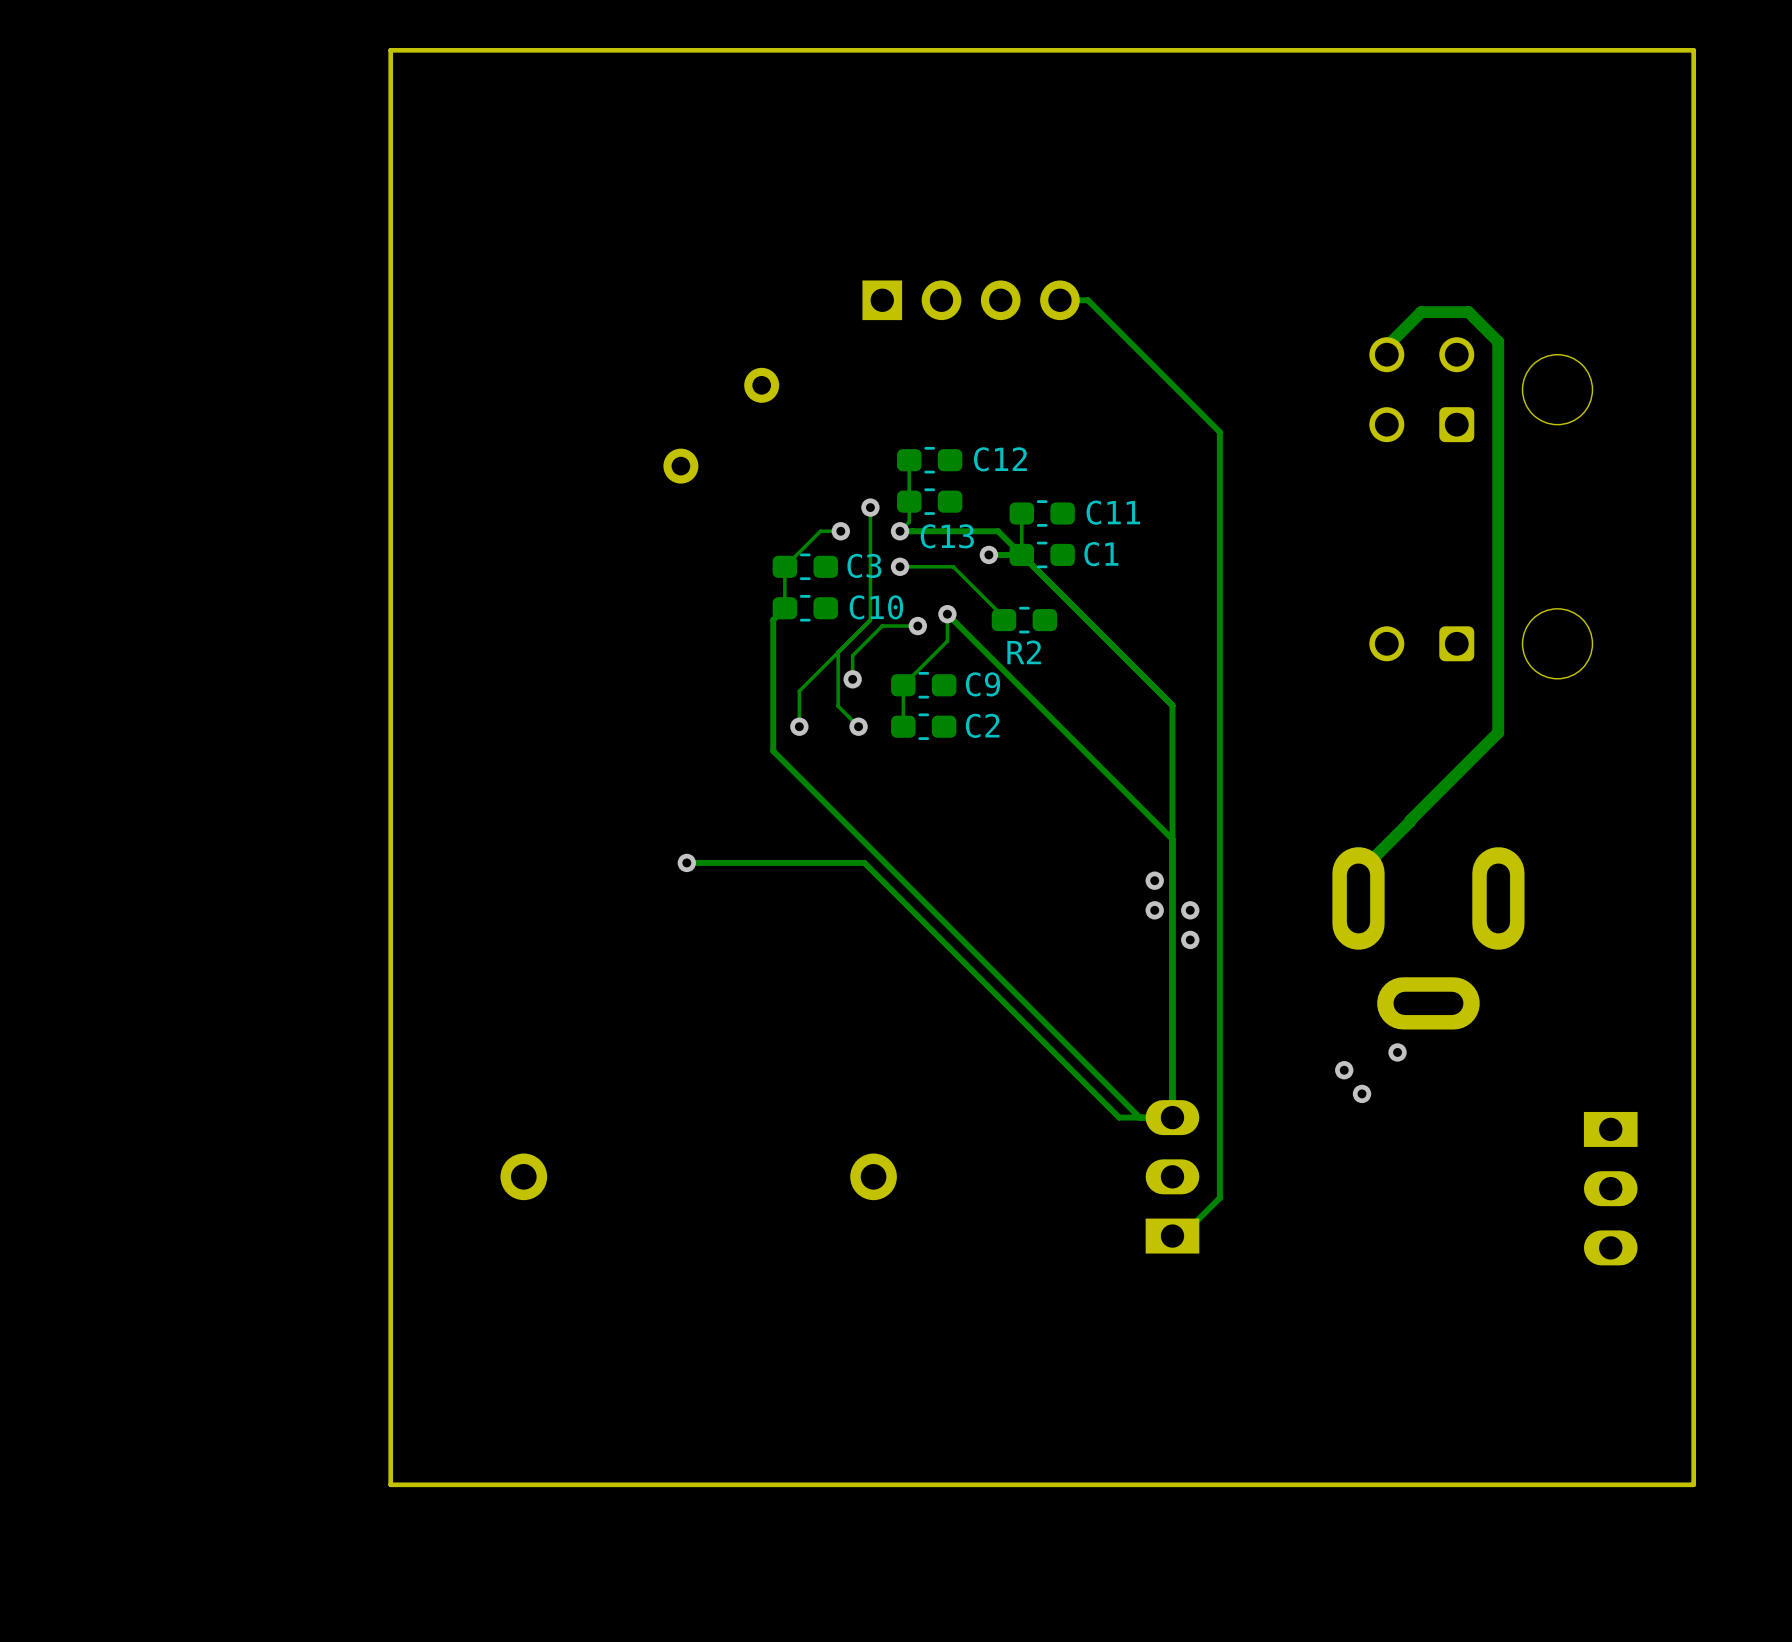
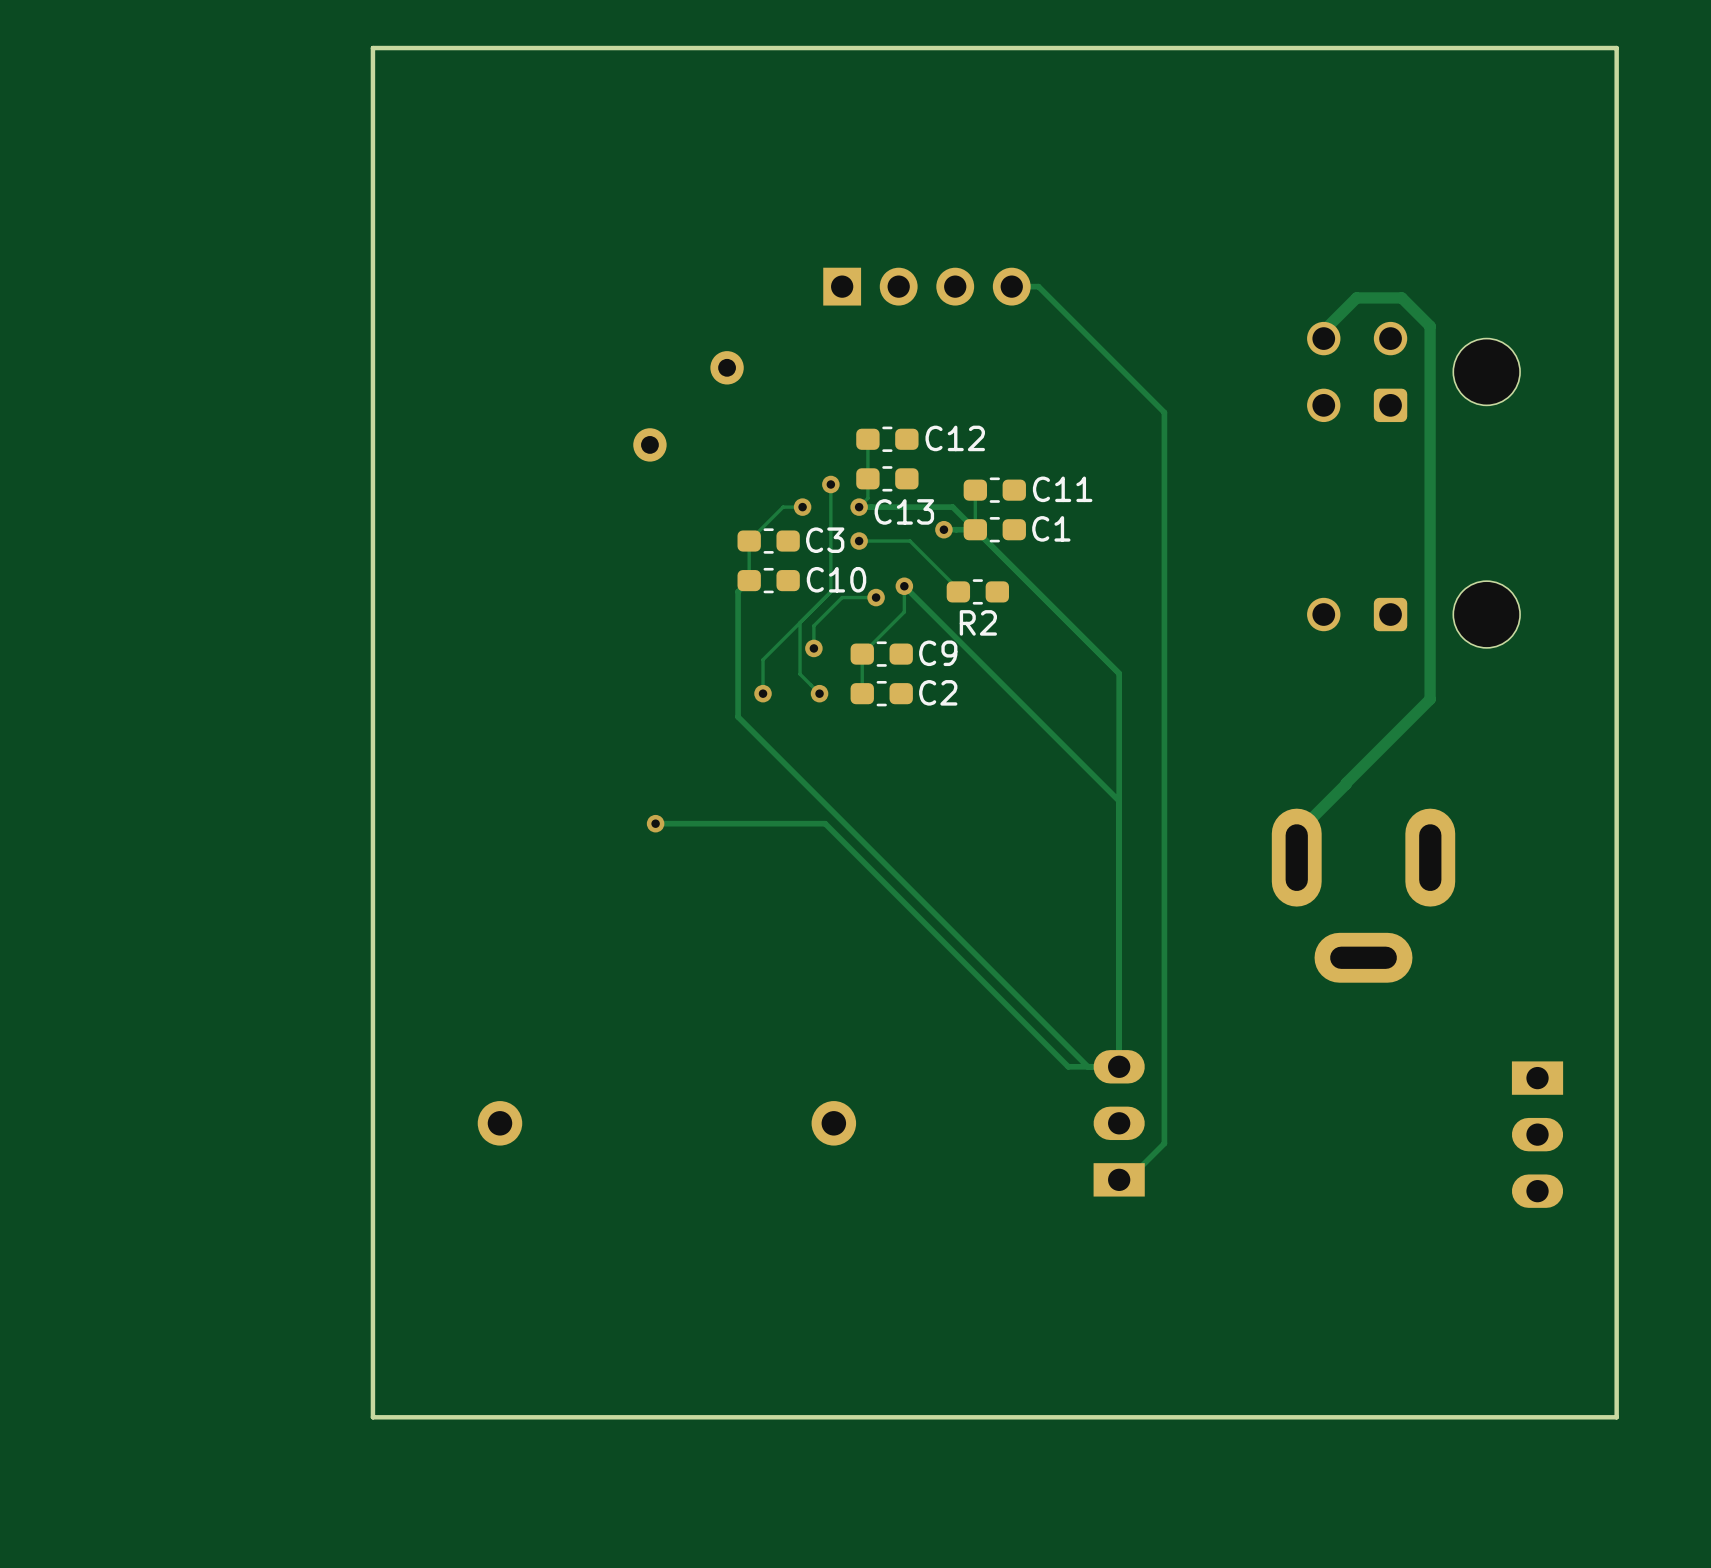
via: (1154, 880) -> none
via: (1154, 910) -> none
via: (1190, 910) -> none
via: (1190, 939) -> none
via: (1397, 1052) -> none
via: (1344, 1070) -> none
via: (1362, 1093) -> none

